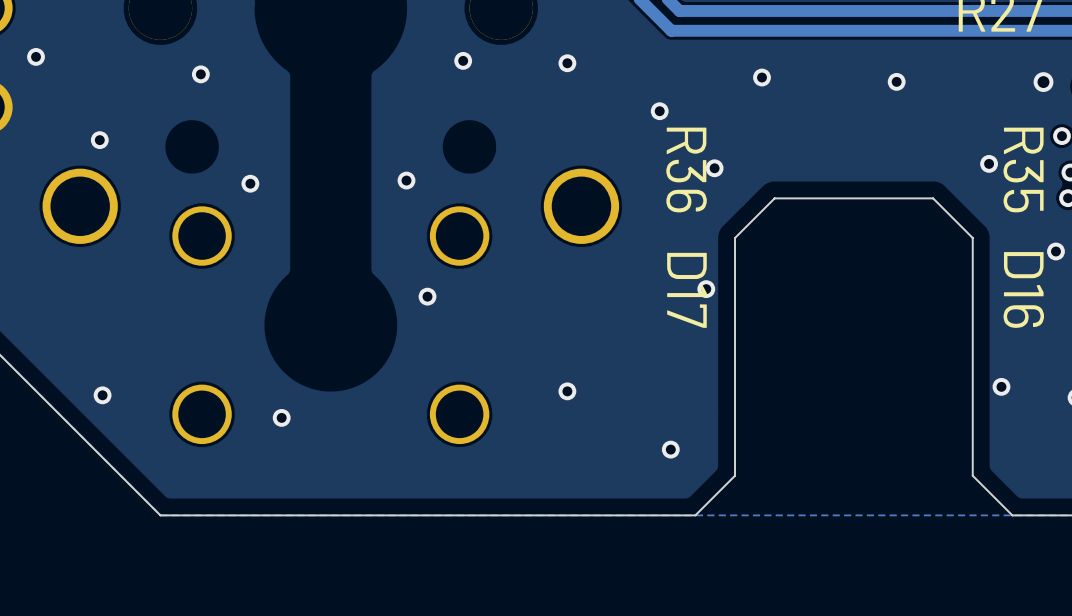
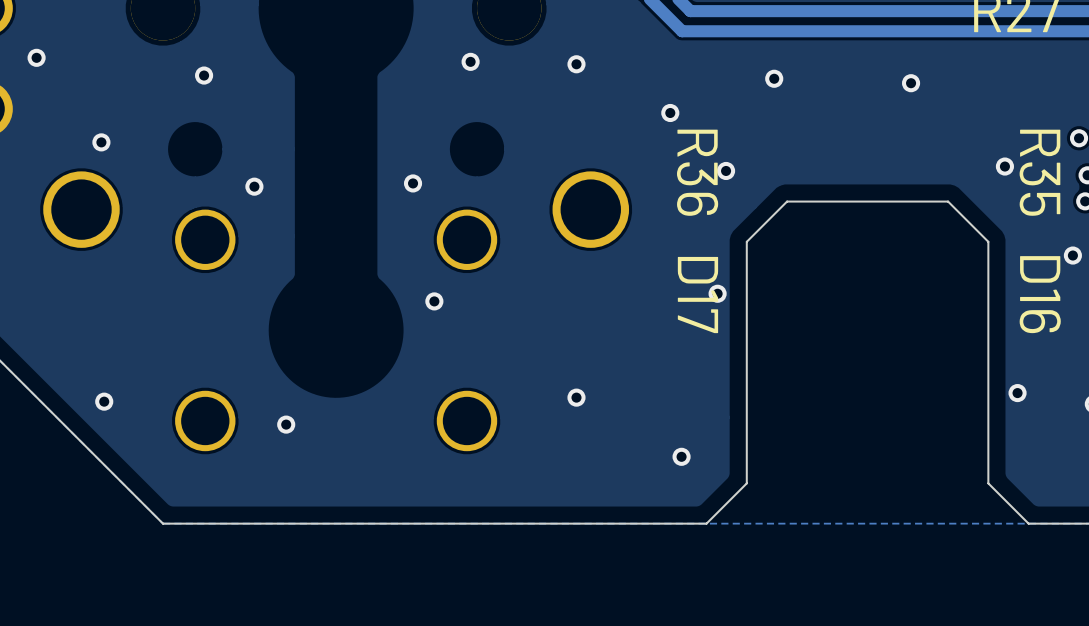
via: (1043, 82) -> none

